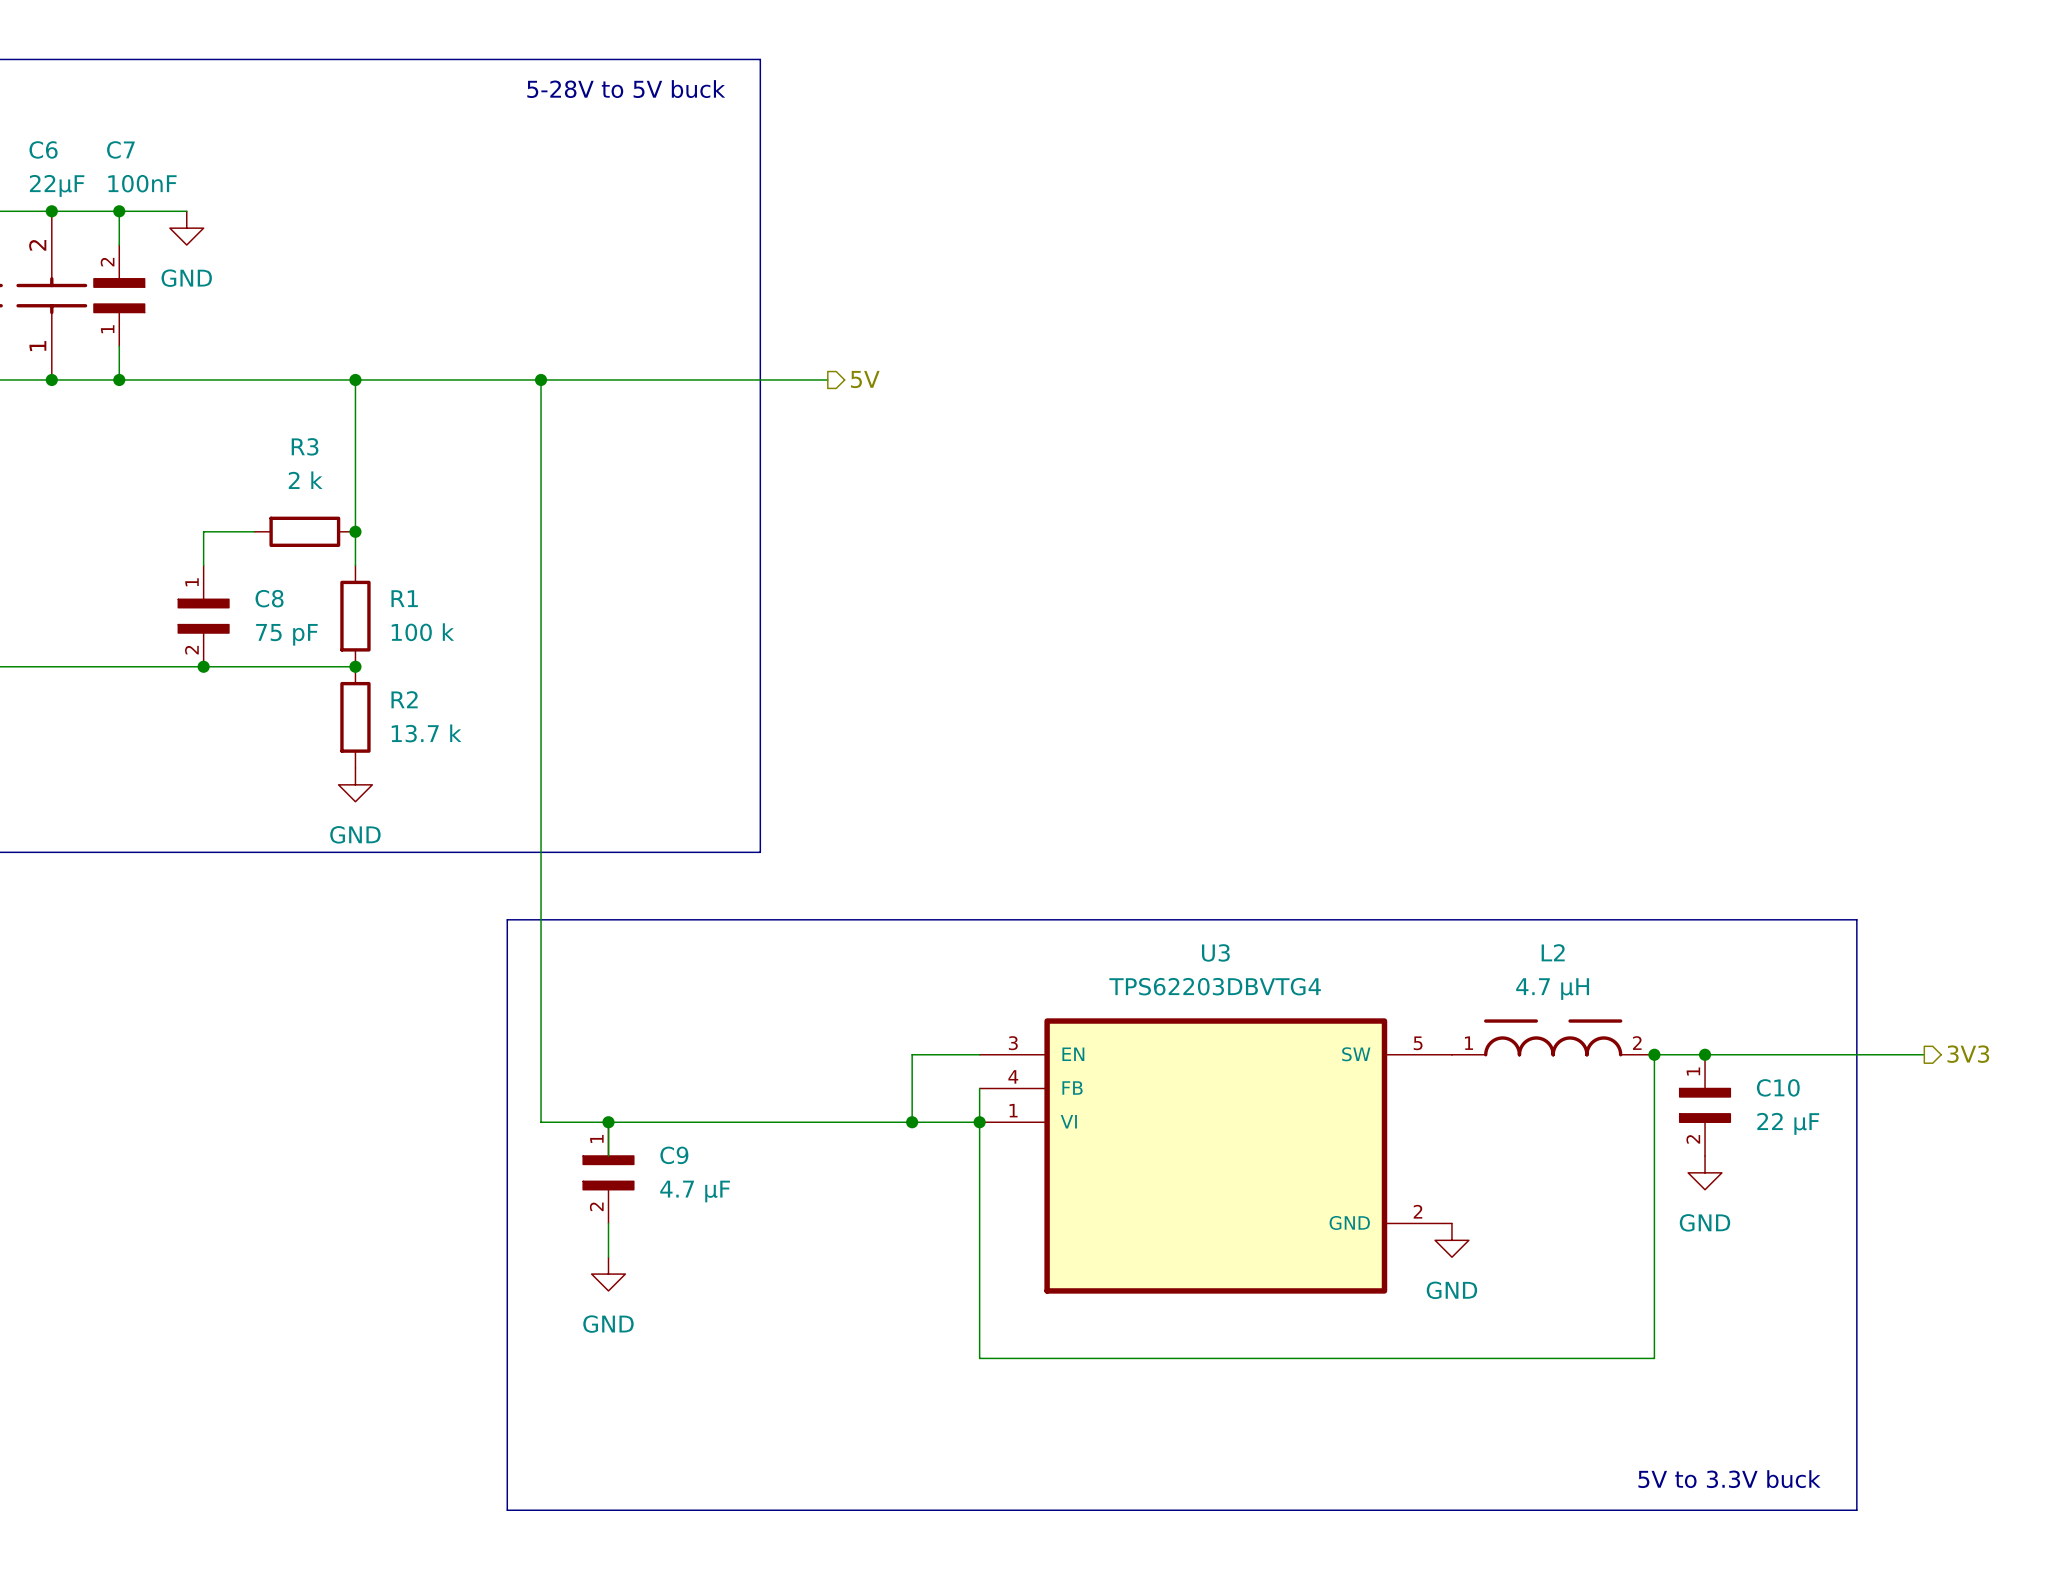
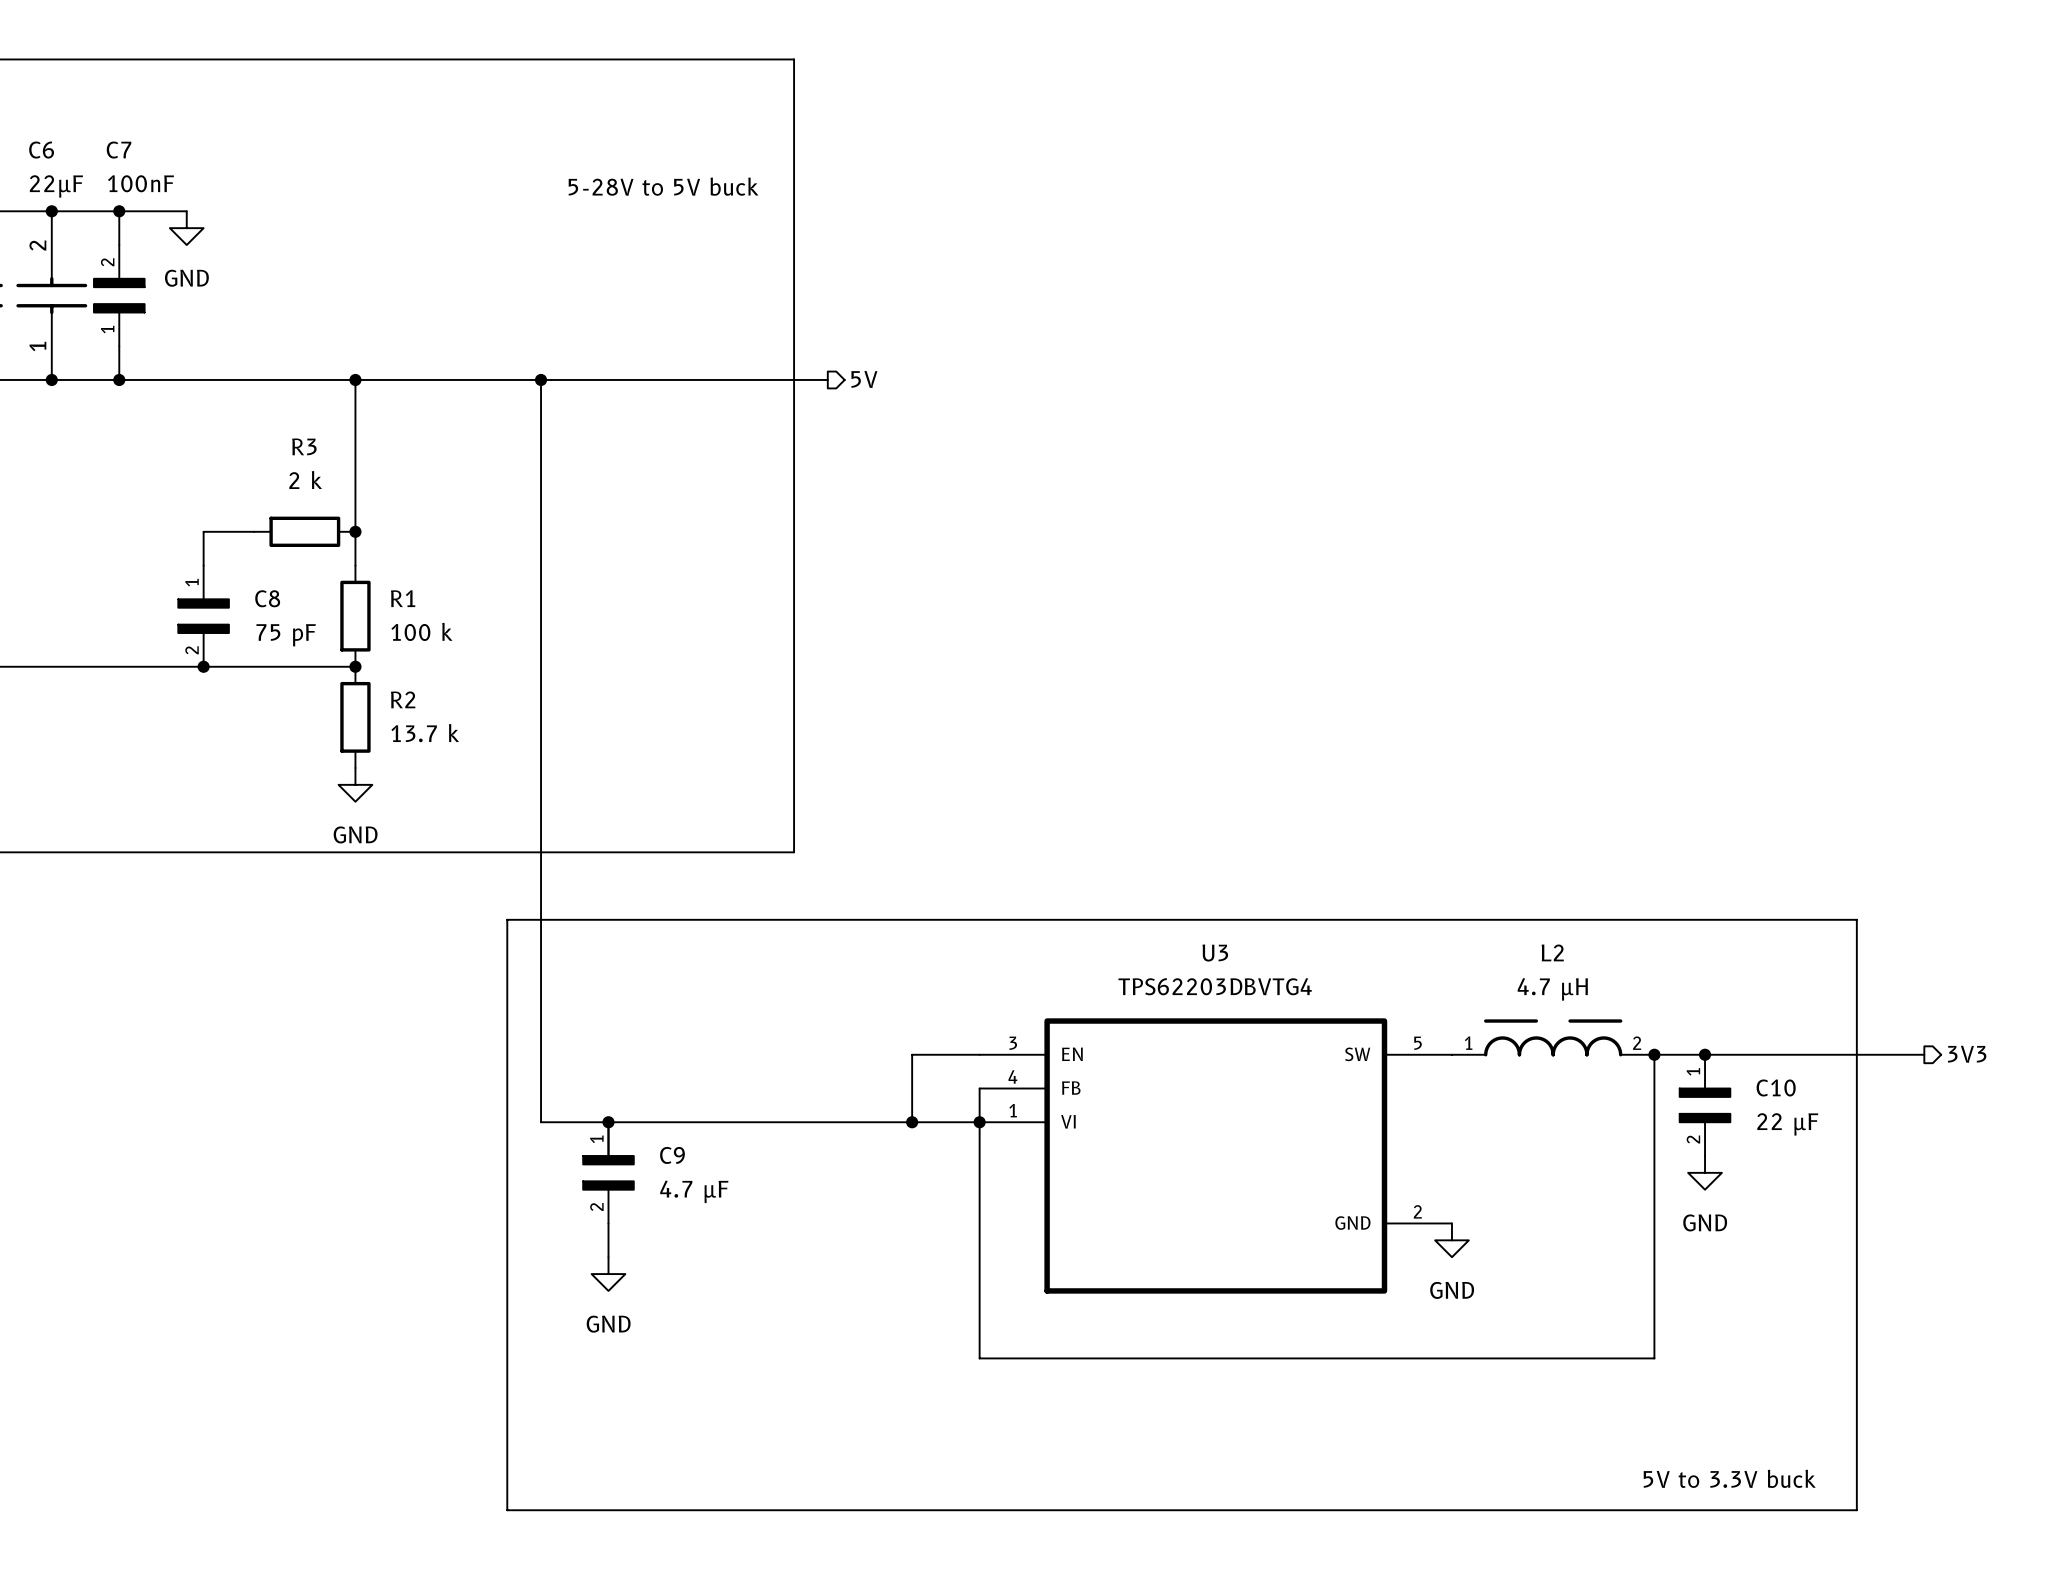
line: (760, 59) (760, 852) -> (760, 59) (794, 59) (794, 852) (760, 852)
text position: 5-28V to 5V buck (626, 89) -> 5-28V to 5V buck (663, 186)

